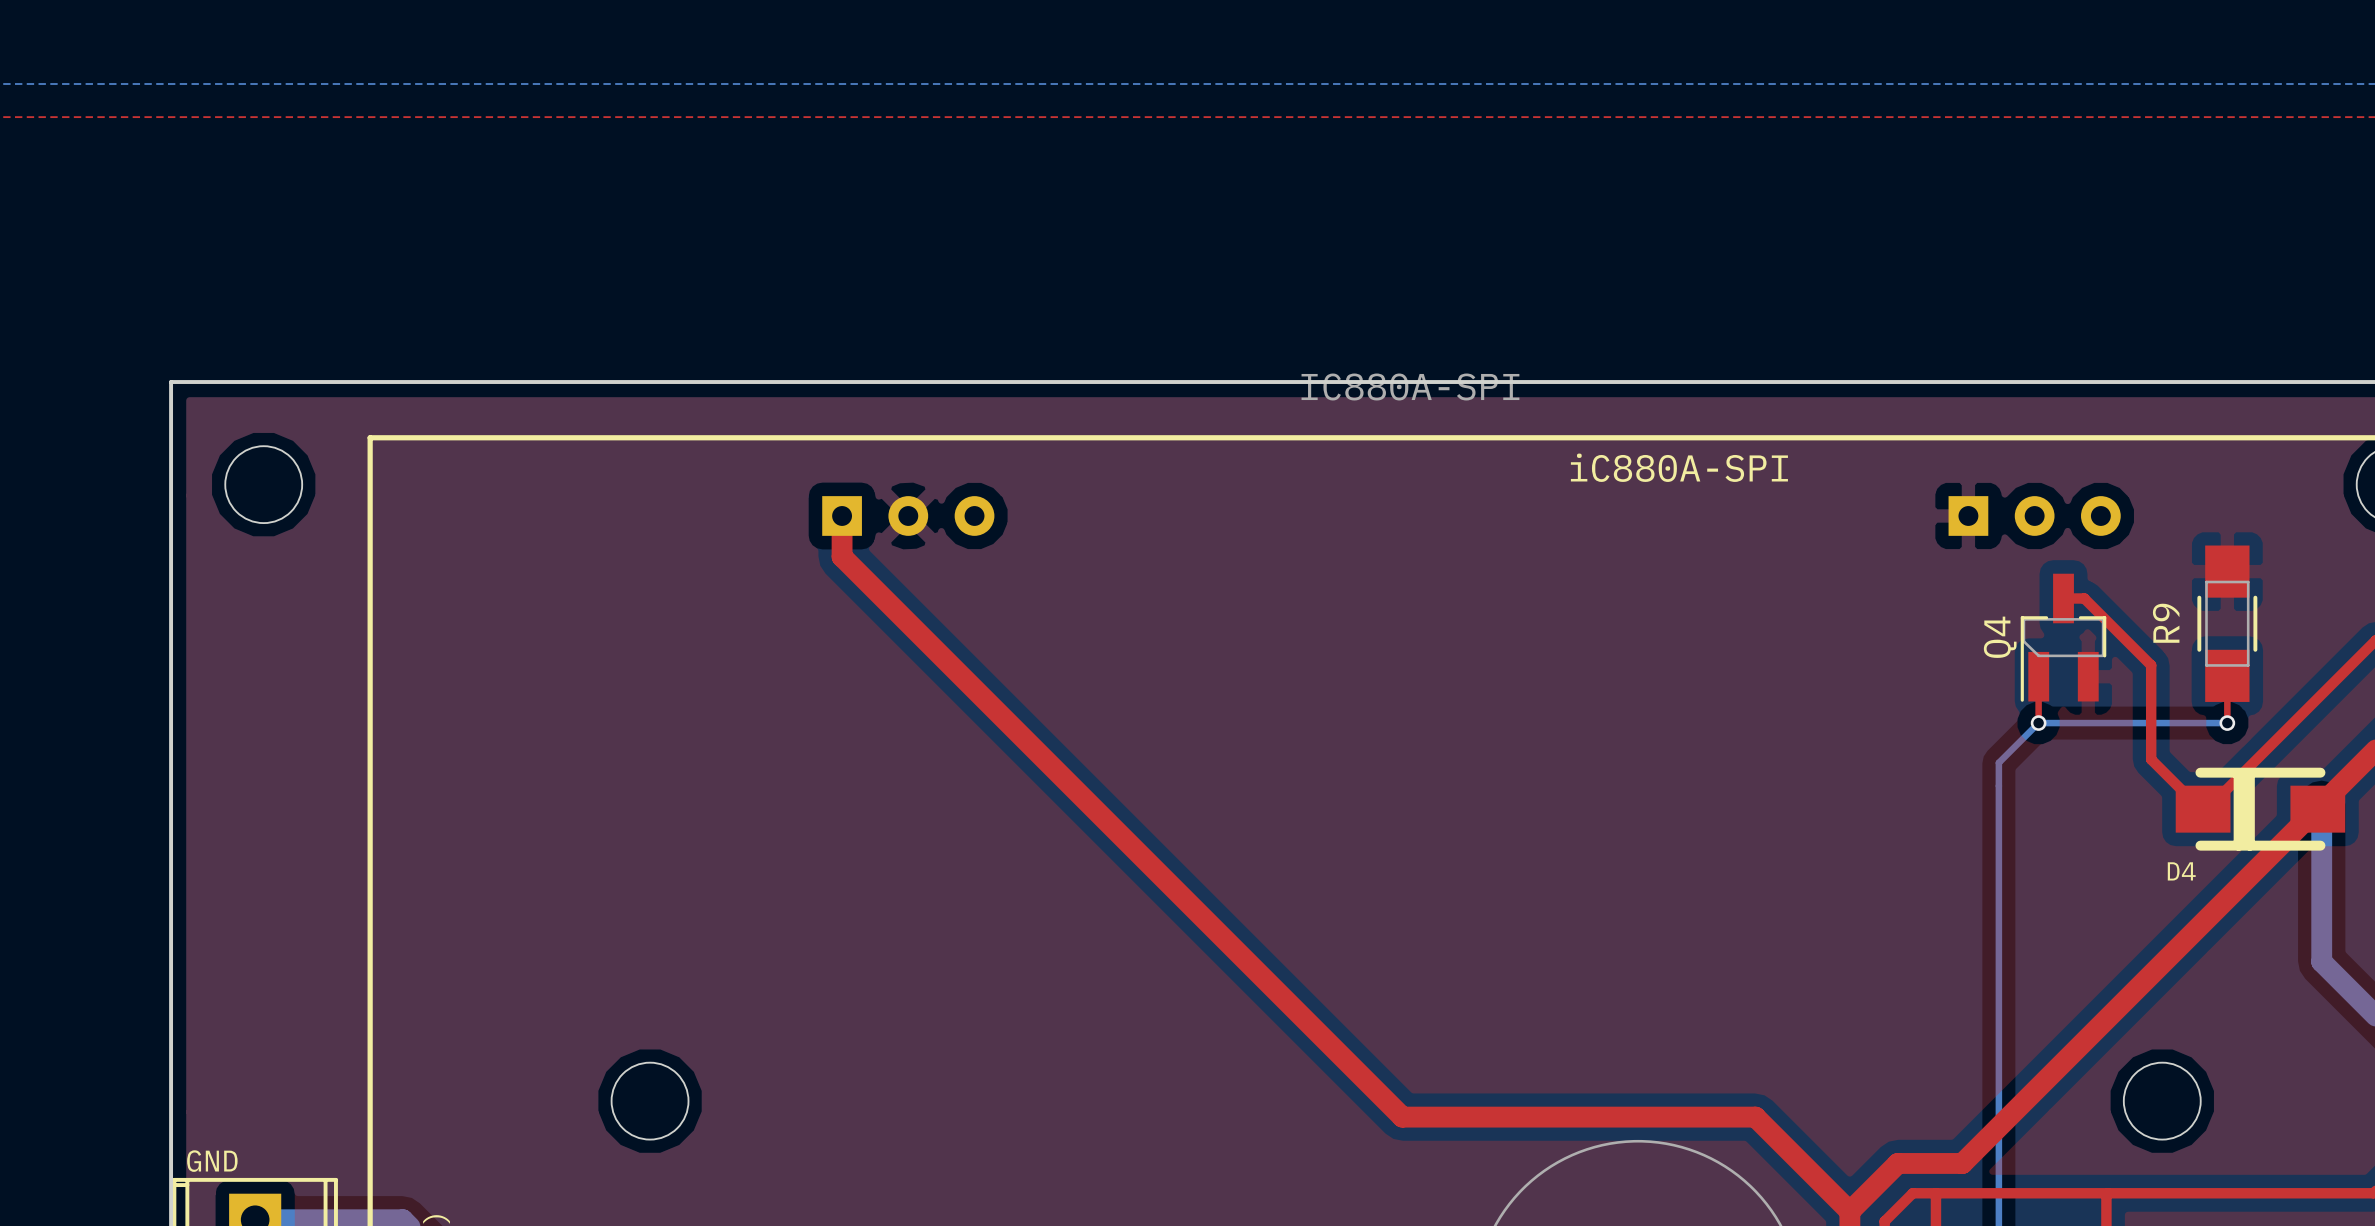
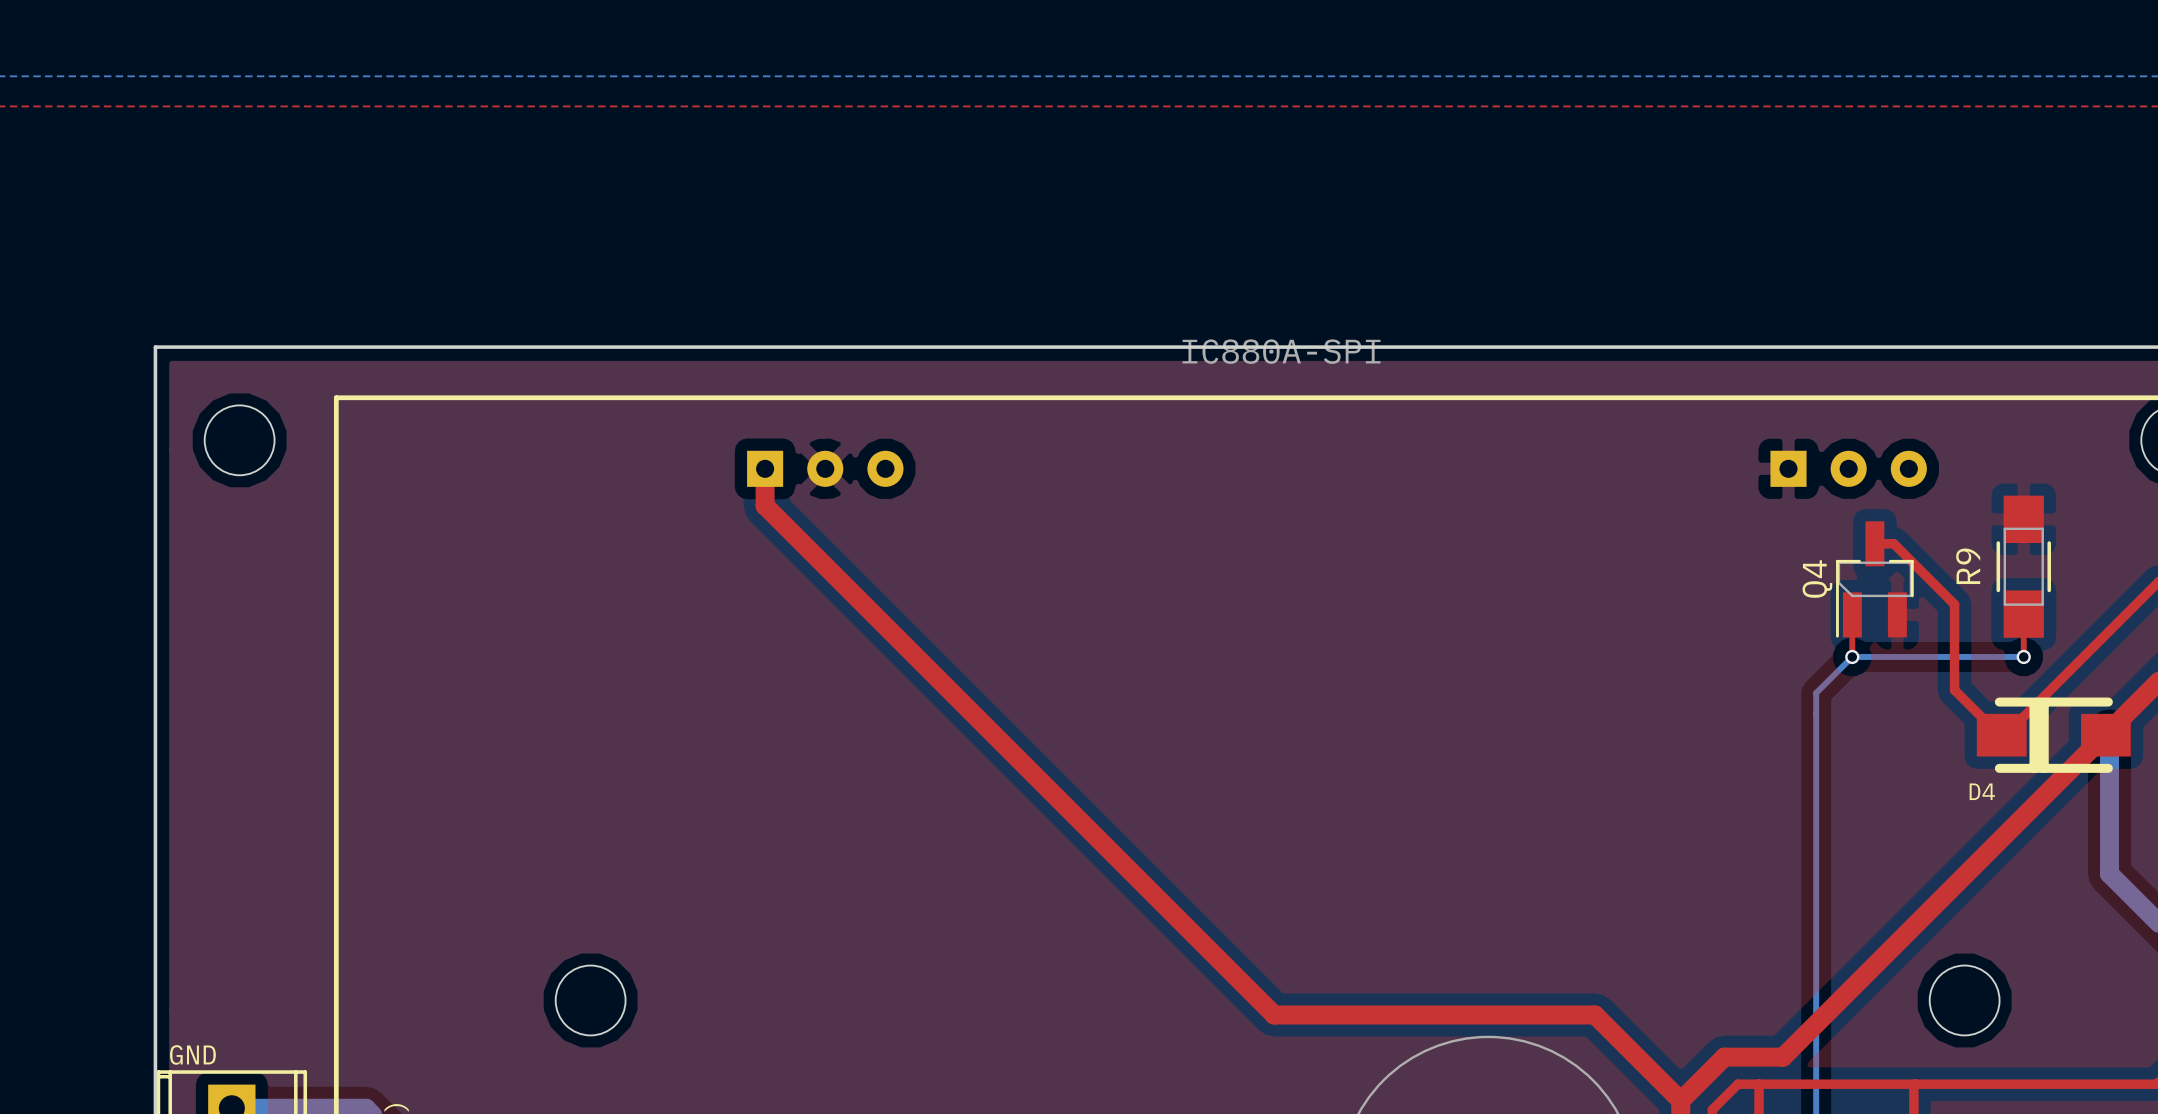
text: iC880A-SPI (1679, 467) -> none

